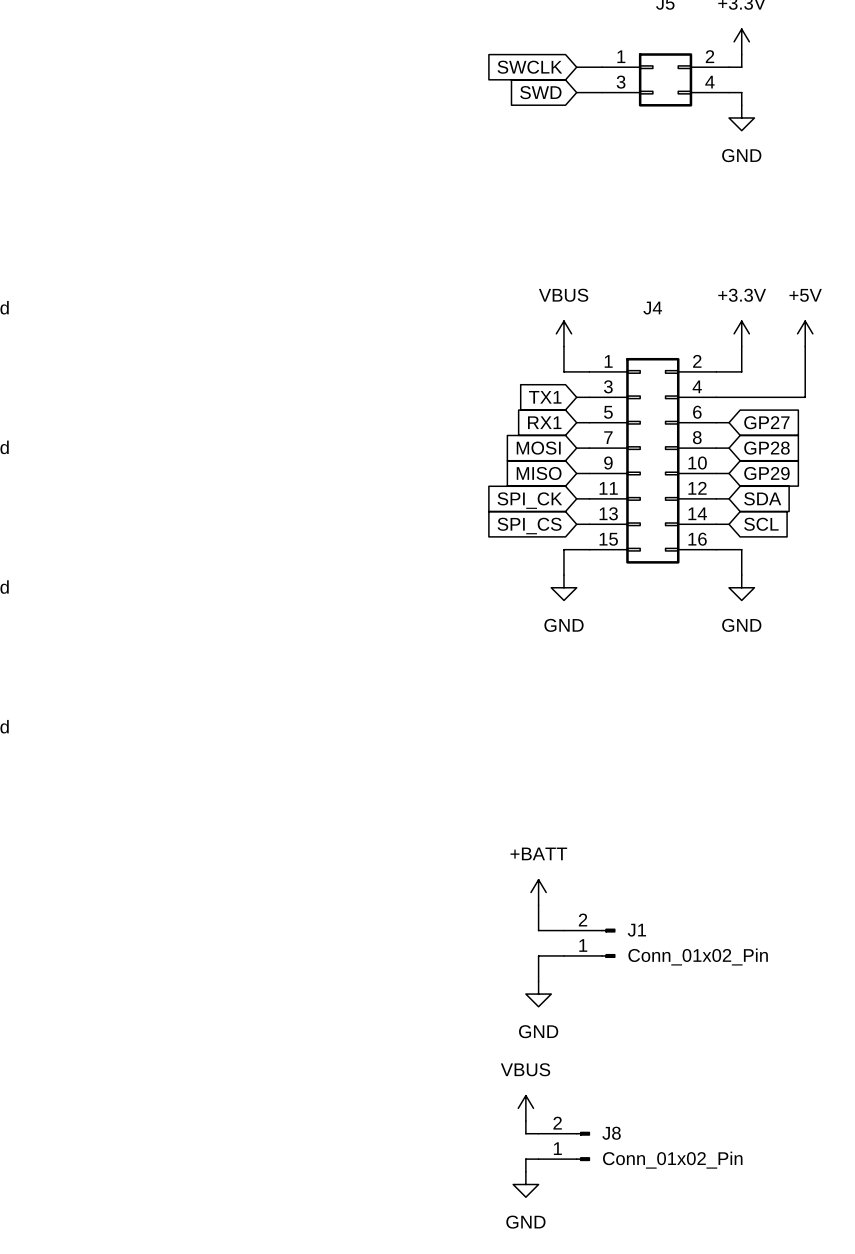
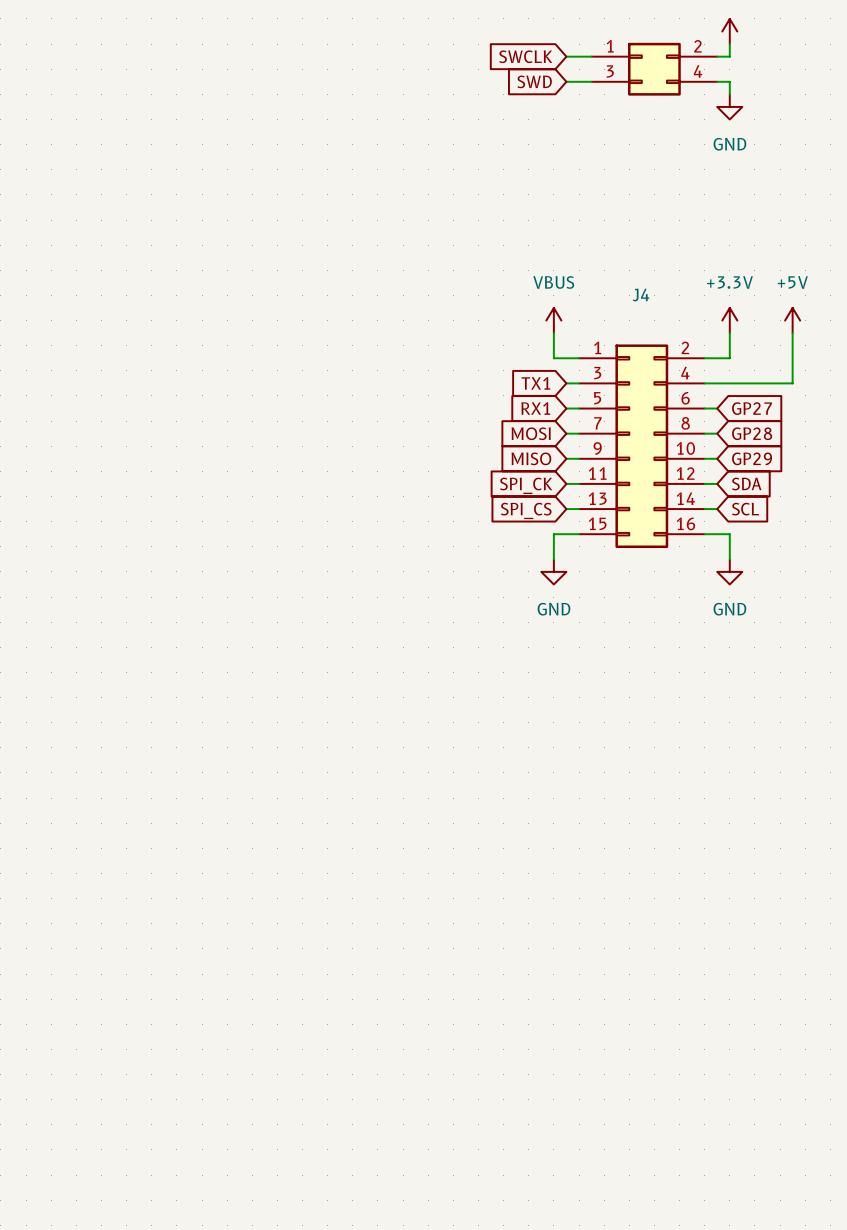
power symbol: +BATT (538, 892) -> none
wire: (538, 905) (538, 930) (563, 930) -> none
J1: Conn_01x02_Pin (589, 943) -> none
wire: (563, 955) (538, 955) (538, 981) -> none
power symbol: GND (538, 994) -> none
power symbol: VBUS (525, 1108) -> none
wire: (525, 1121) (525, 1133) (538, 1133) -> none
J8: Conn_01x02_Pin (564, 1146) -> none
wire: (538, 1159) (525, 1159) (525, 1171) -> none
power symbol: GND (525, 1184) -> none

